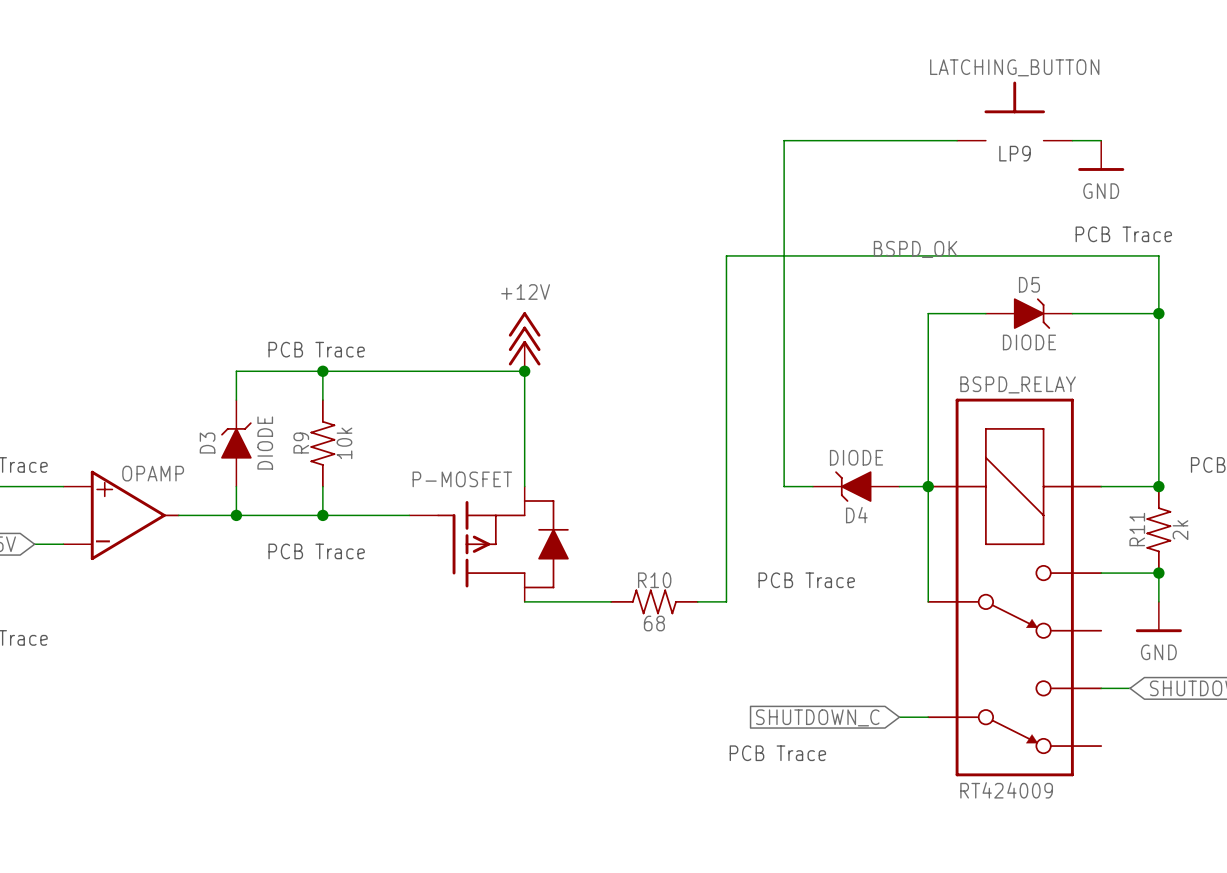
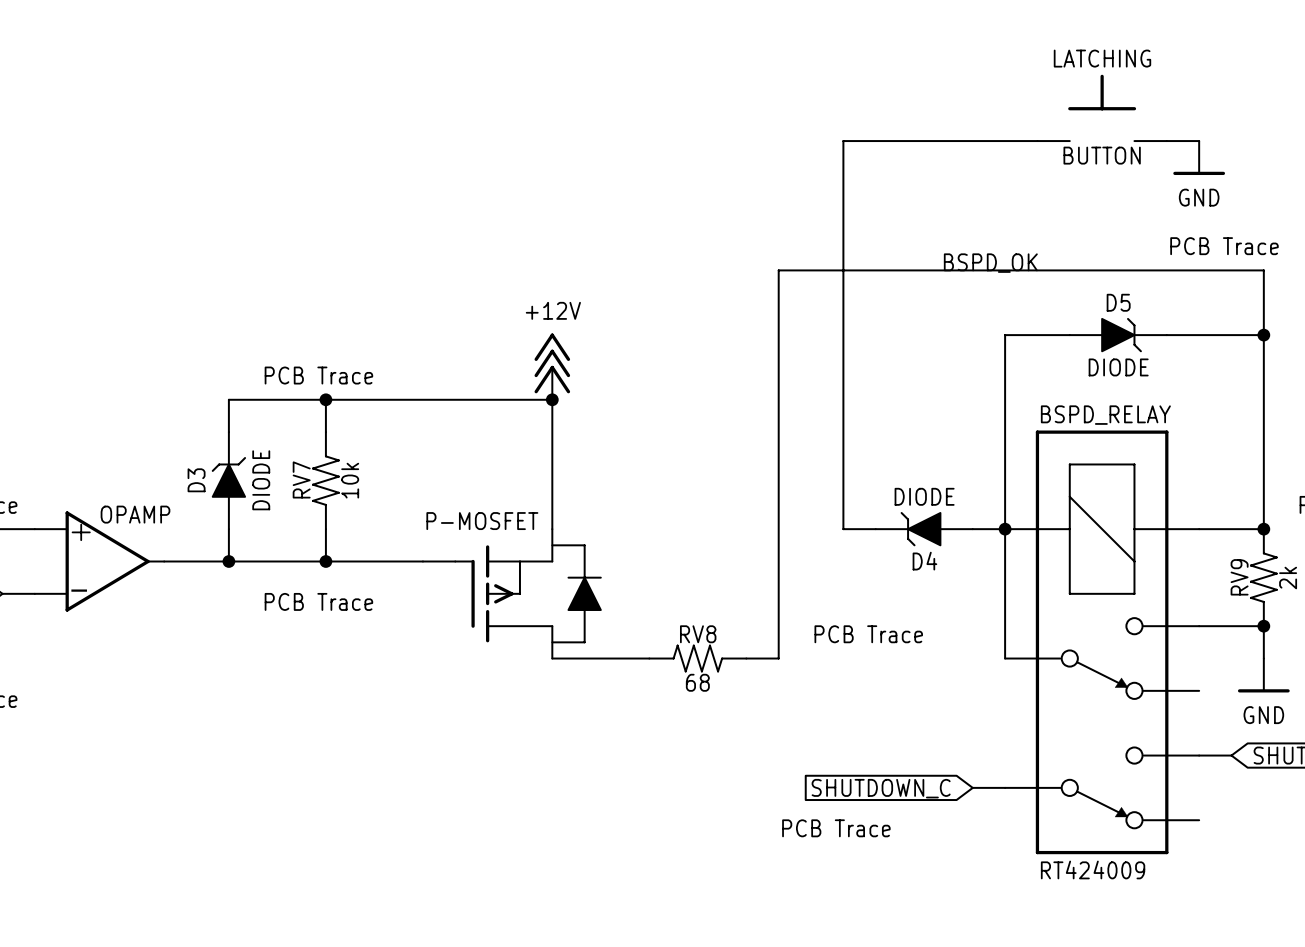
LATCHING_BUTTON name: LATCHING_BUTTON (1014, 67) -> LATCHING (1102, 58)
LATCHING_BUTTON text: none -> BUTTON (1102, 155)
LATCHING_BUTTON text: LP9 (1015, 153) -> none
R9 name: R9 (301, 443) -> RV7 (301, 479)
R11 name: R11 (1137, 529) -> RV9 (1239, 577)
R10 name: R10 (654, 580) -> RV8 (698, 634)

